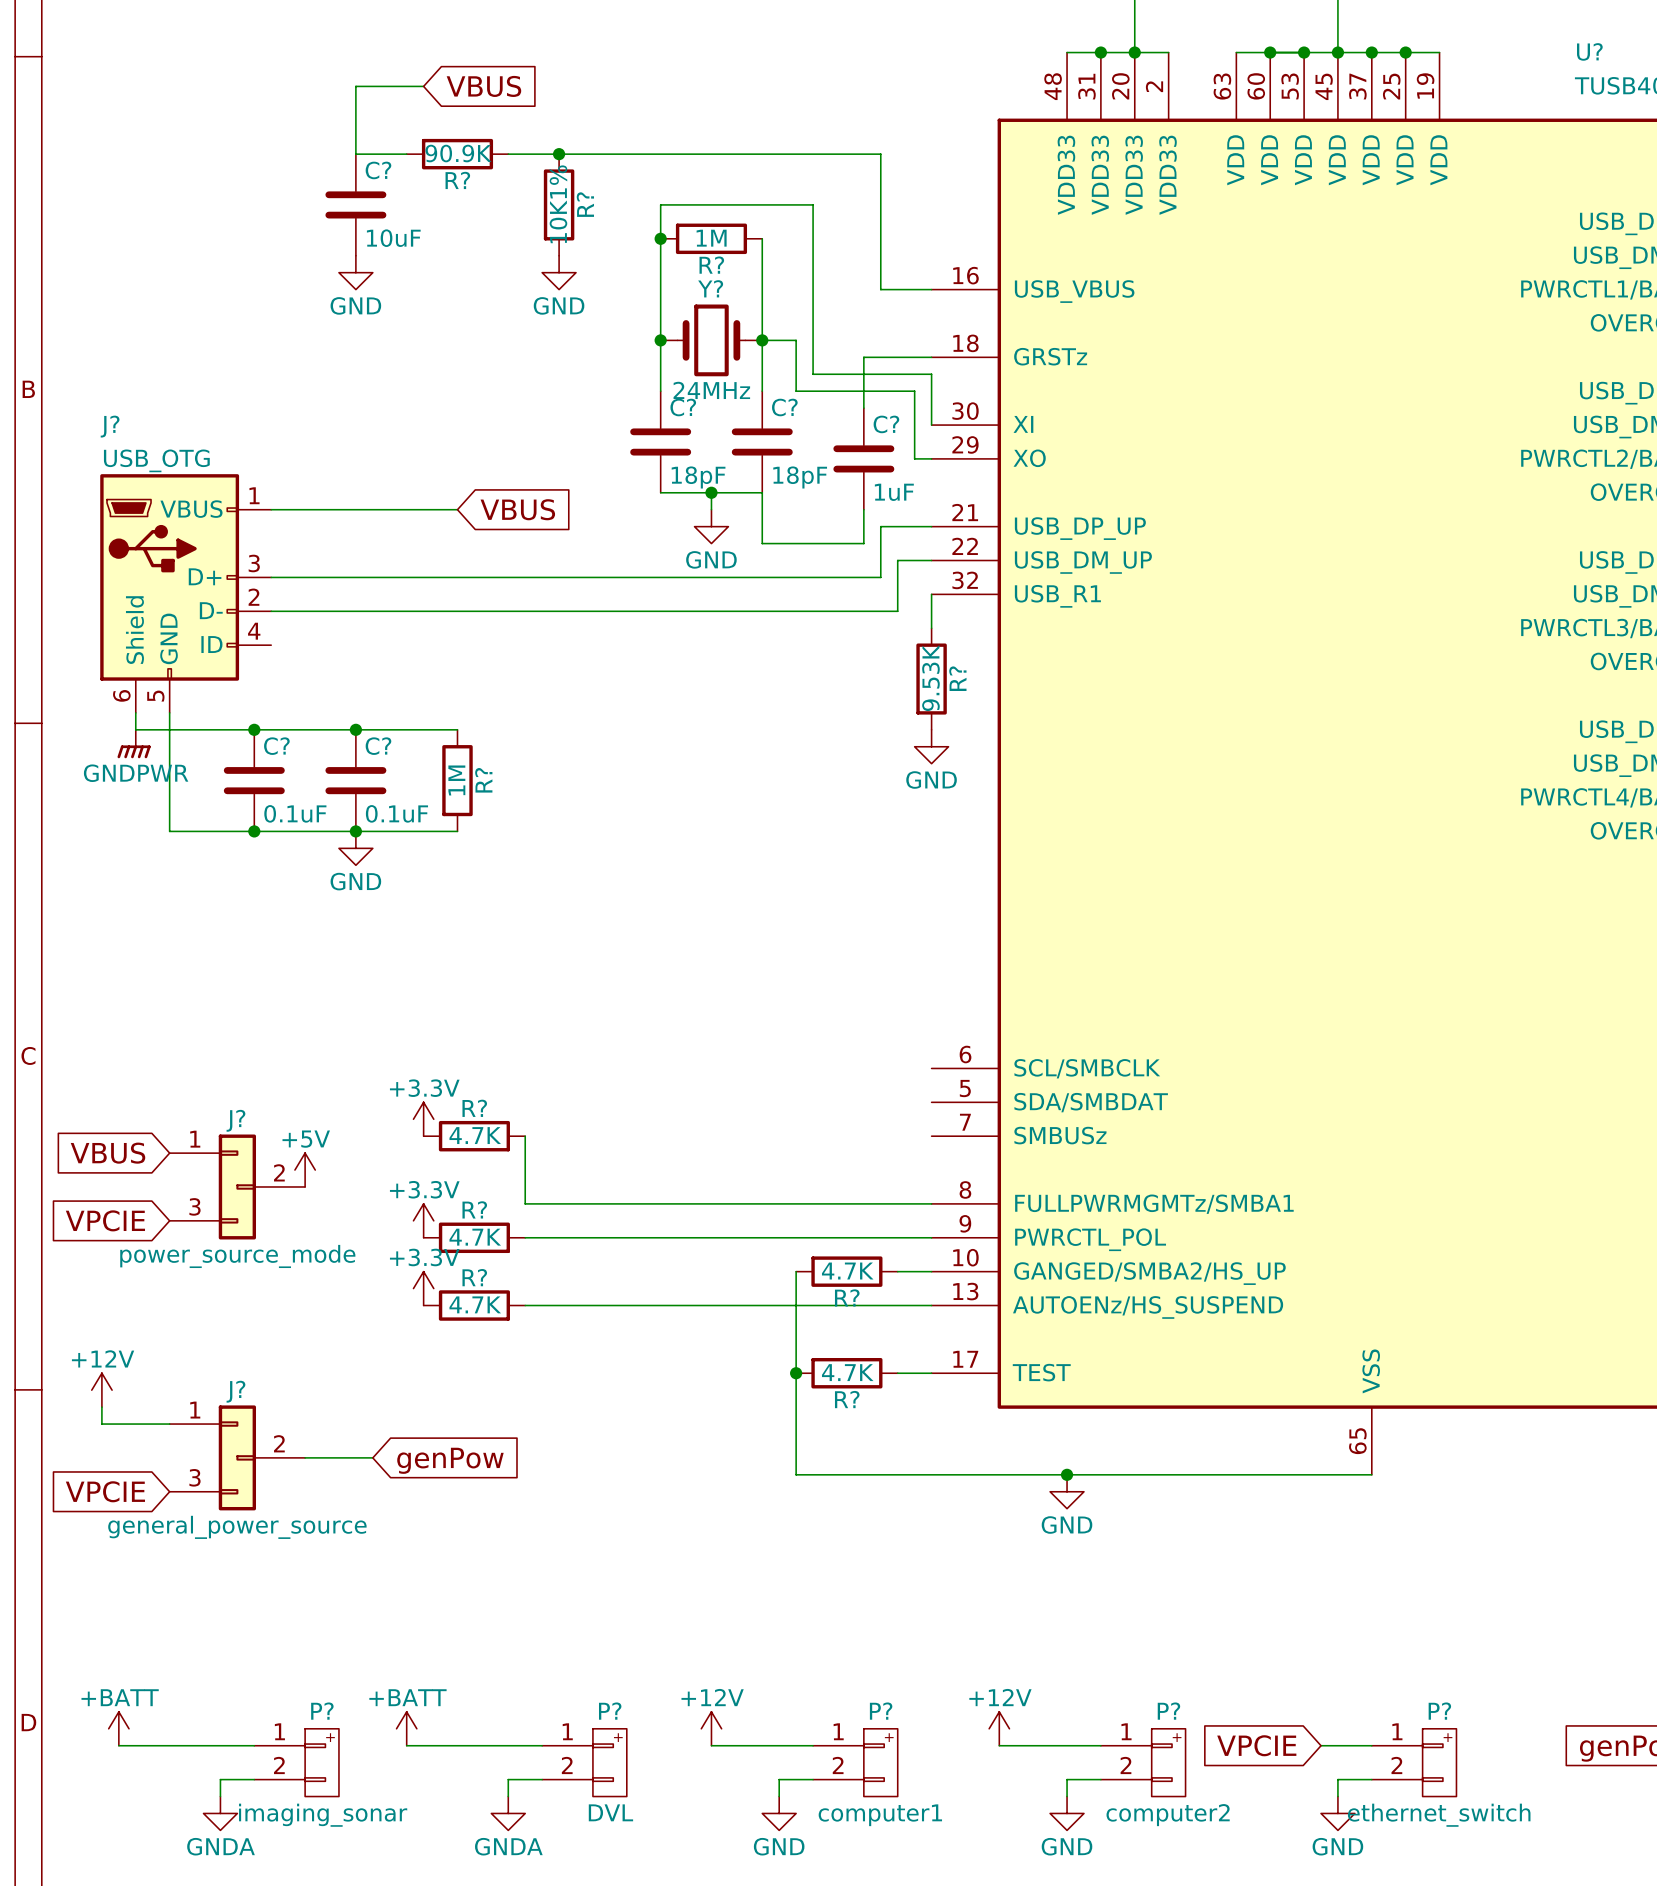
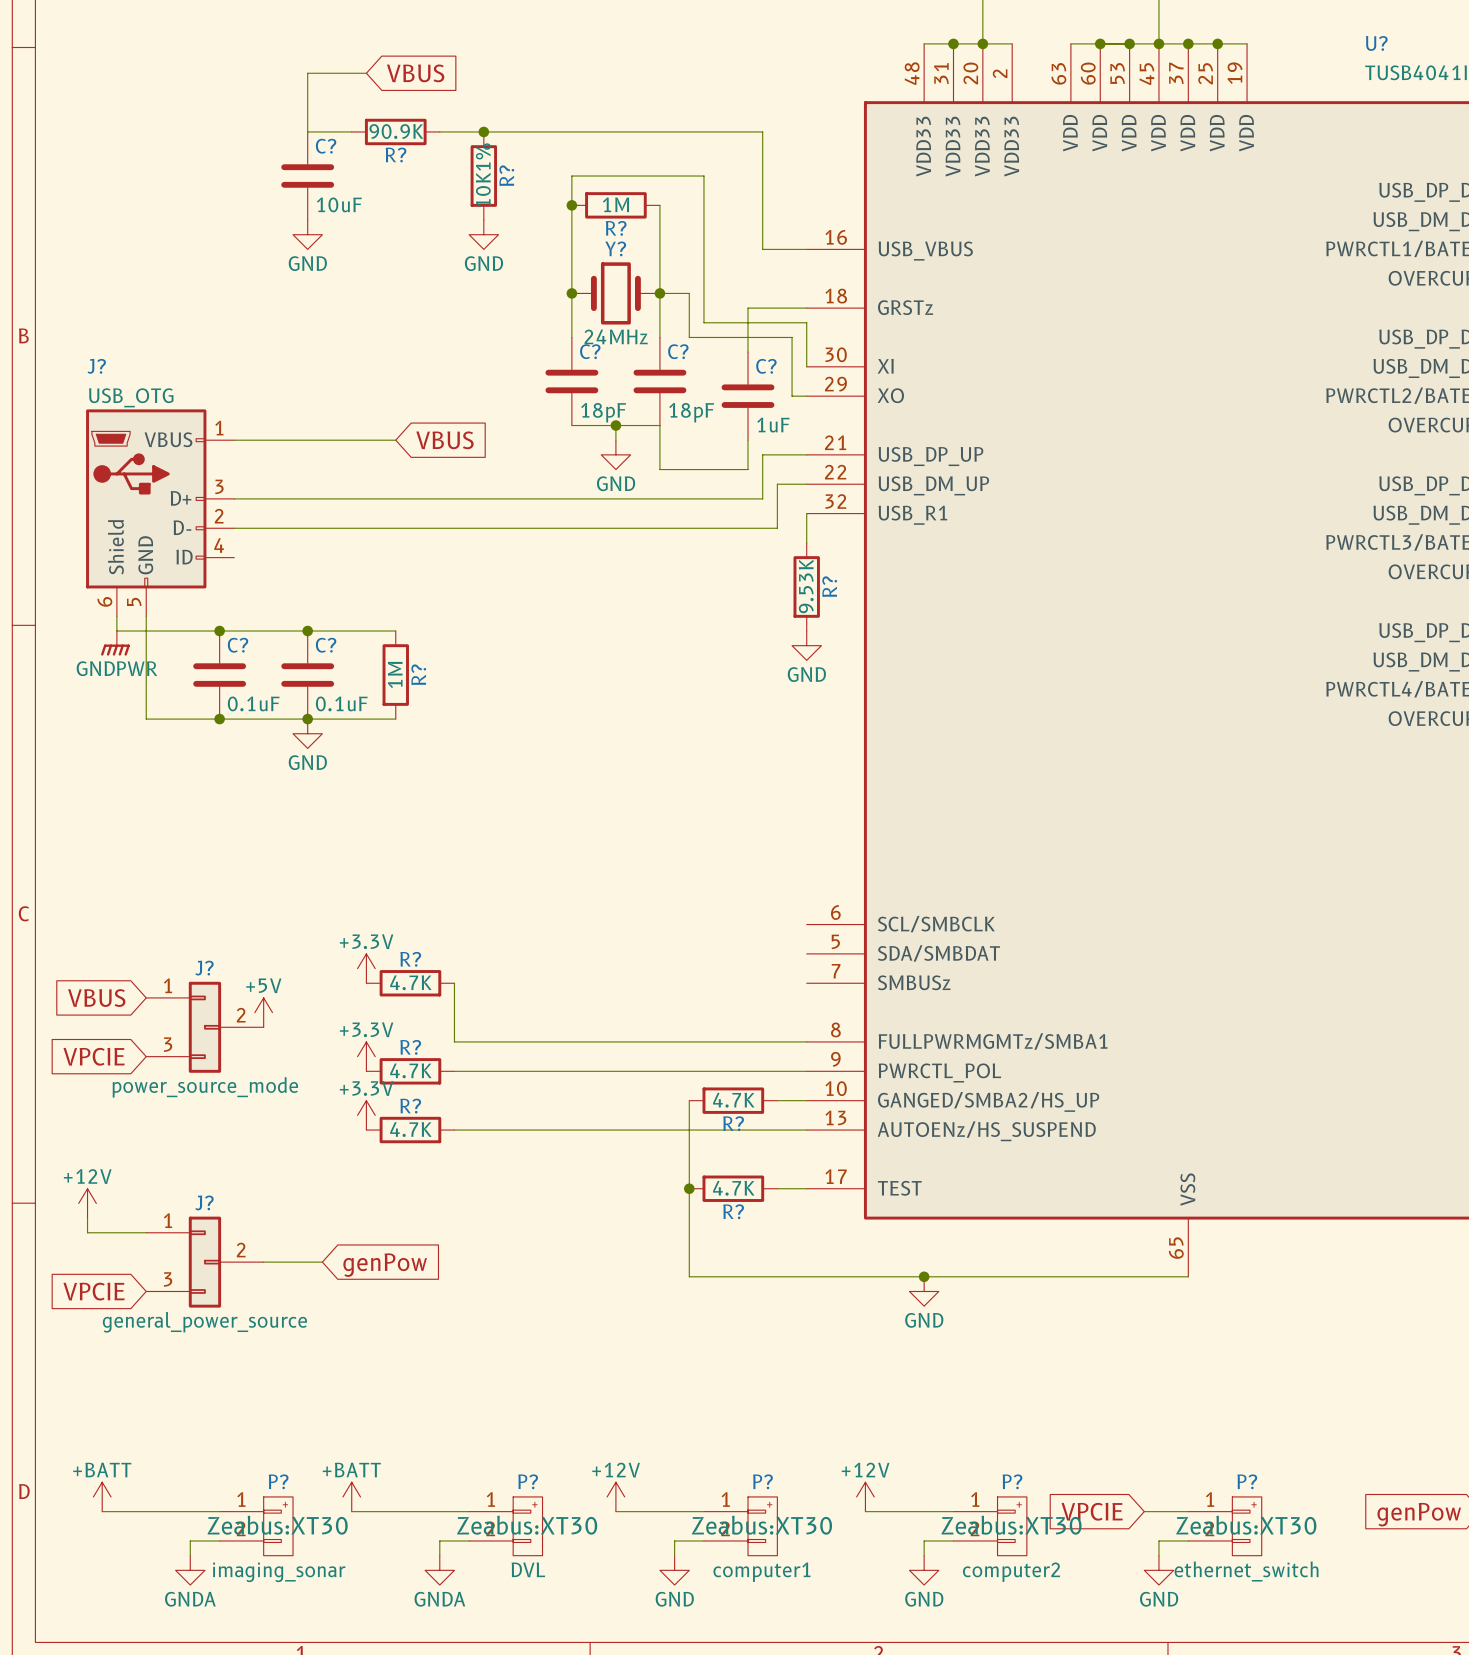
P? text: none -> Zeabus:XT30 (277, 1525)
P? text: none -> Zeabus:XT30 (527, 1525)
P? text: none -> Zeabus:XT30 (761, 1525)
P? text: none -> Zeabus:XT30 (1011, 1525)
P? text: none -> Zeabus:XT30 (1246, 1525)

